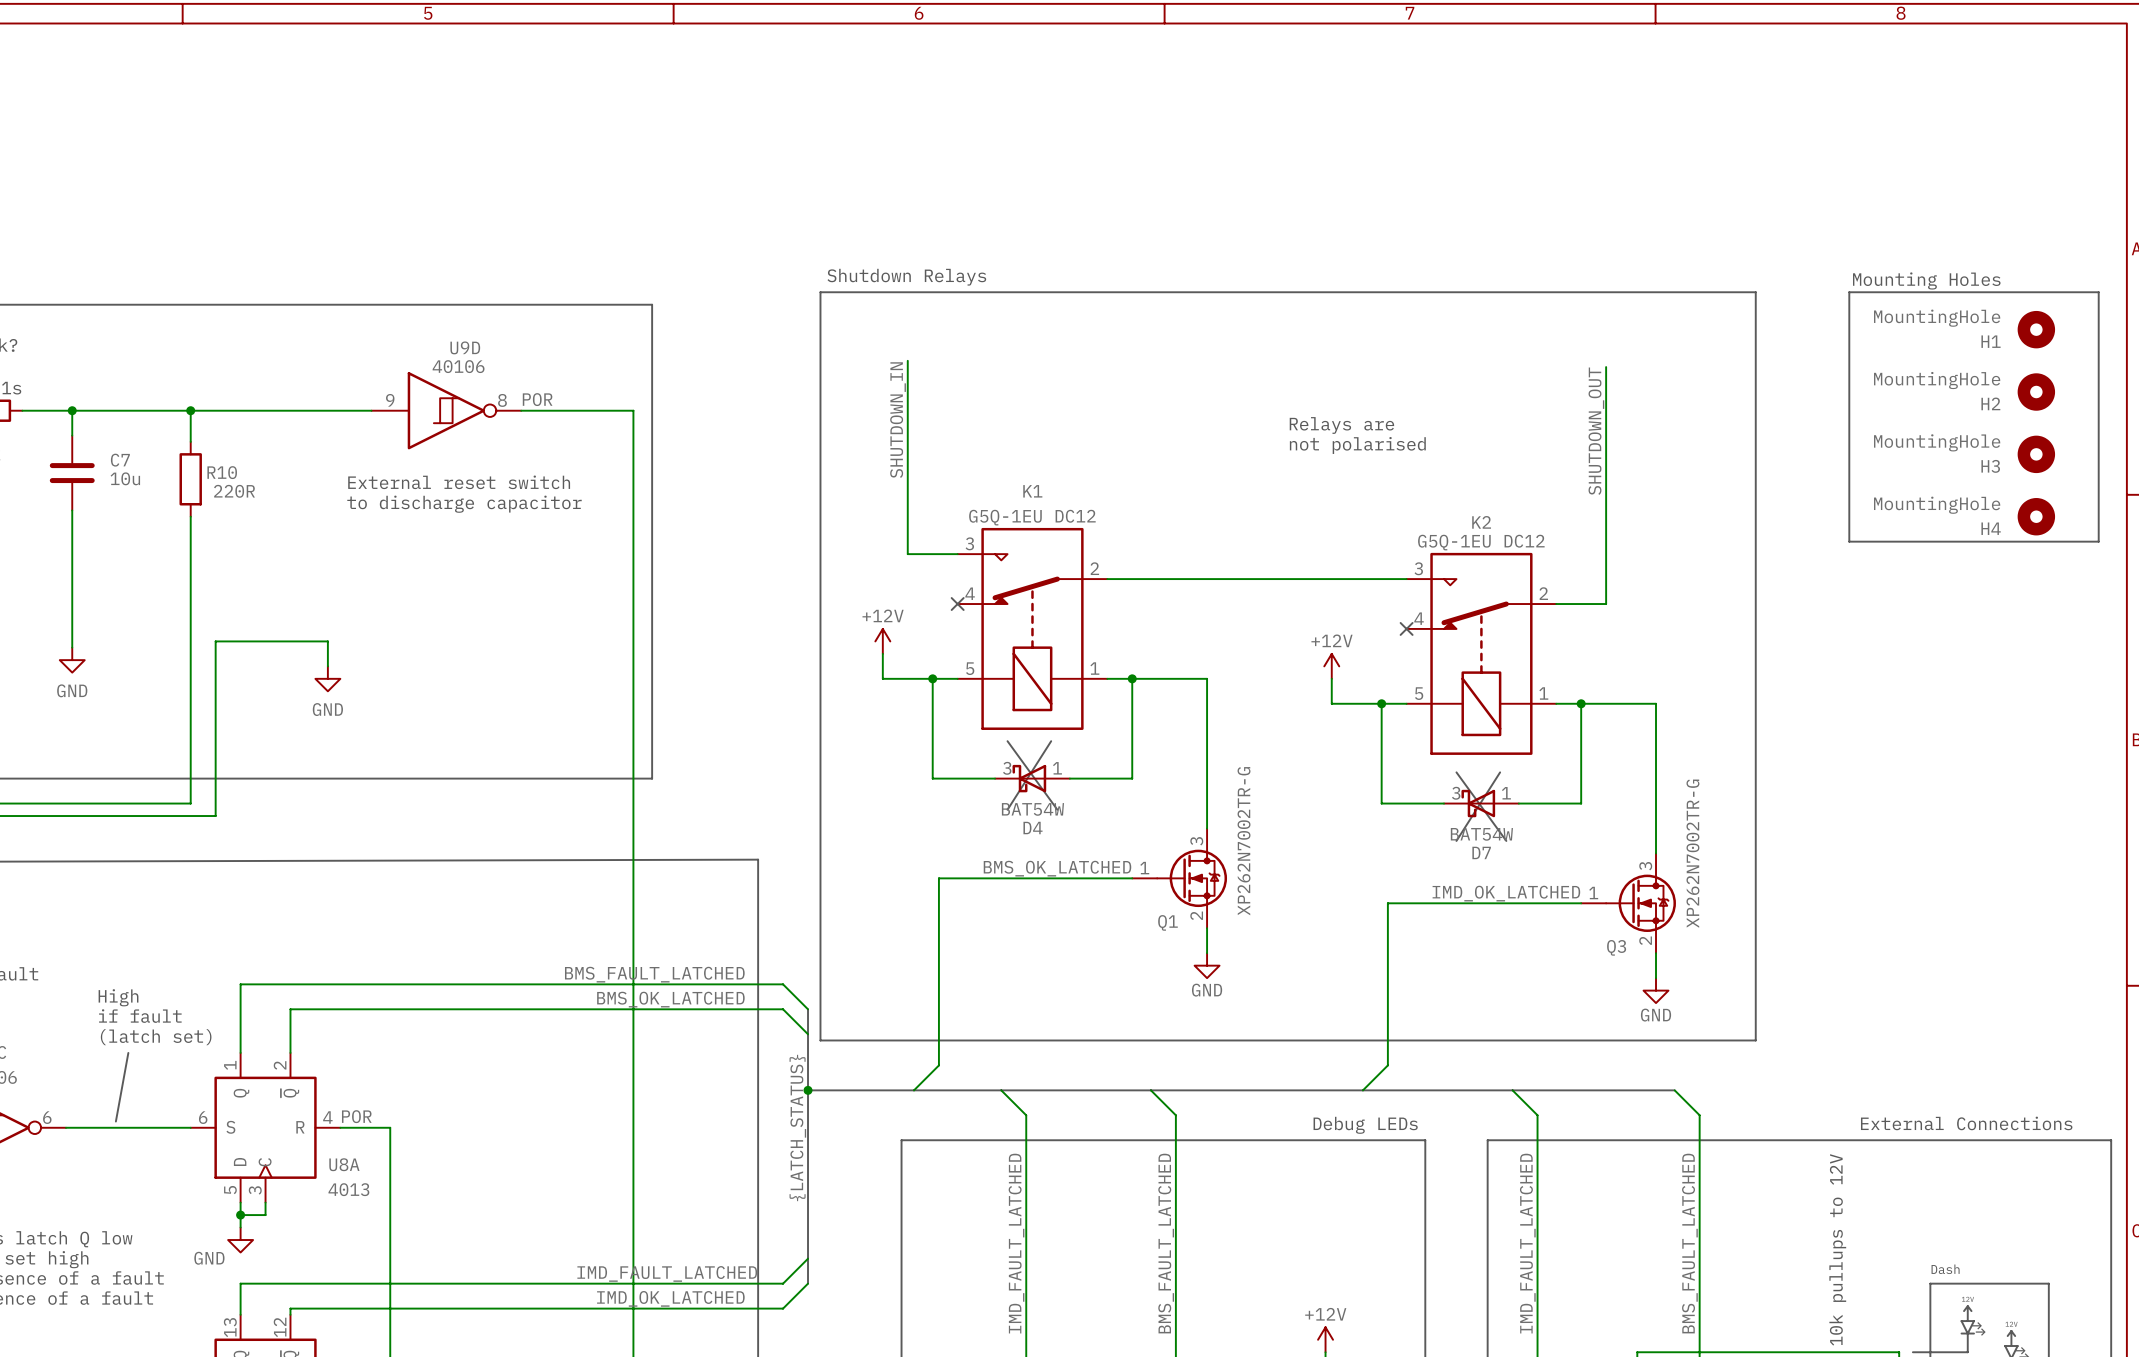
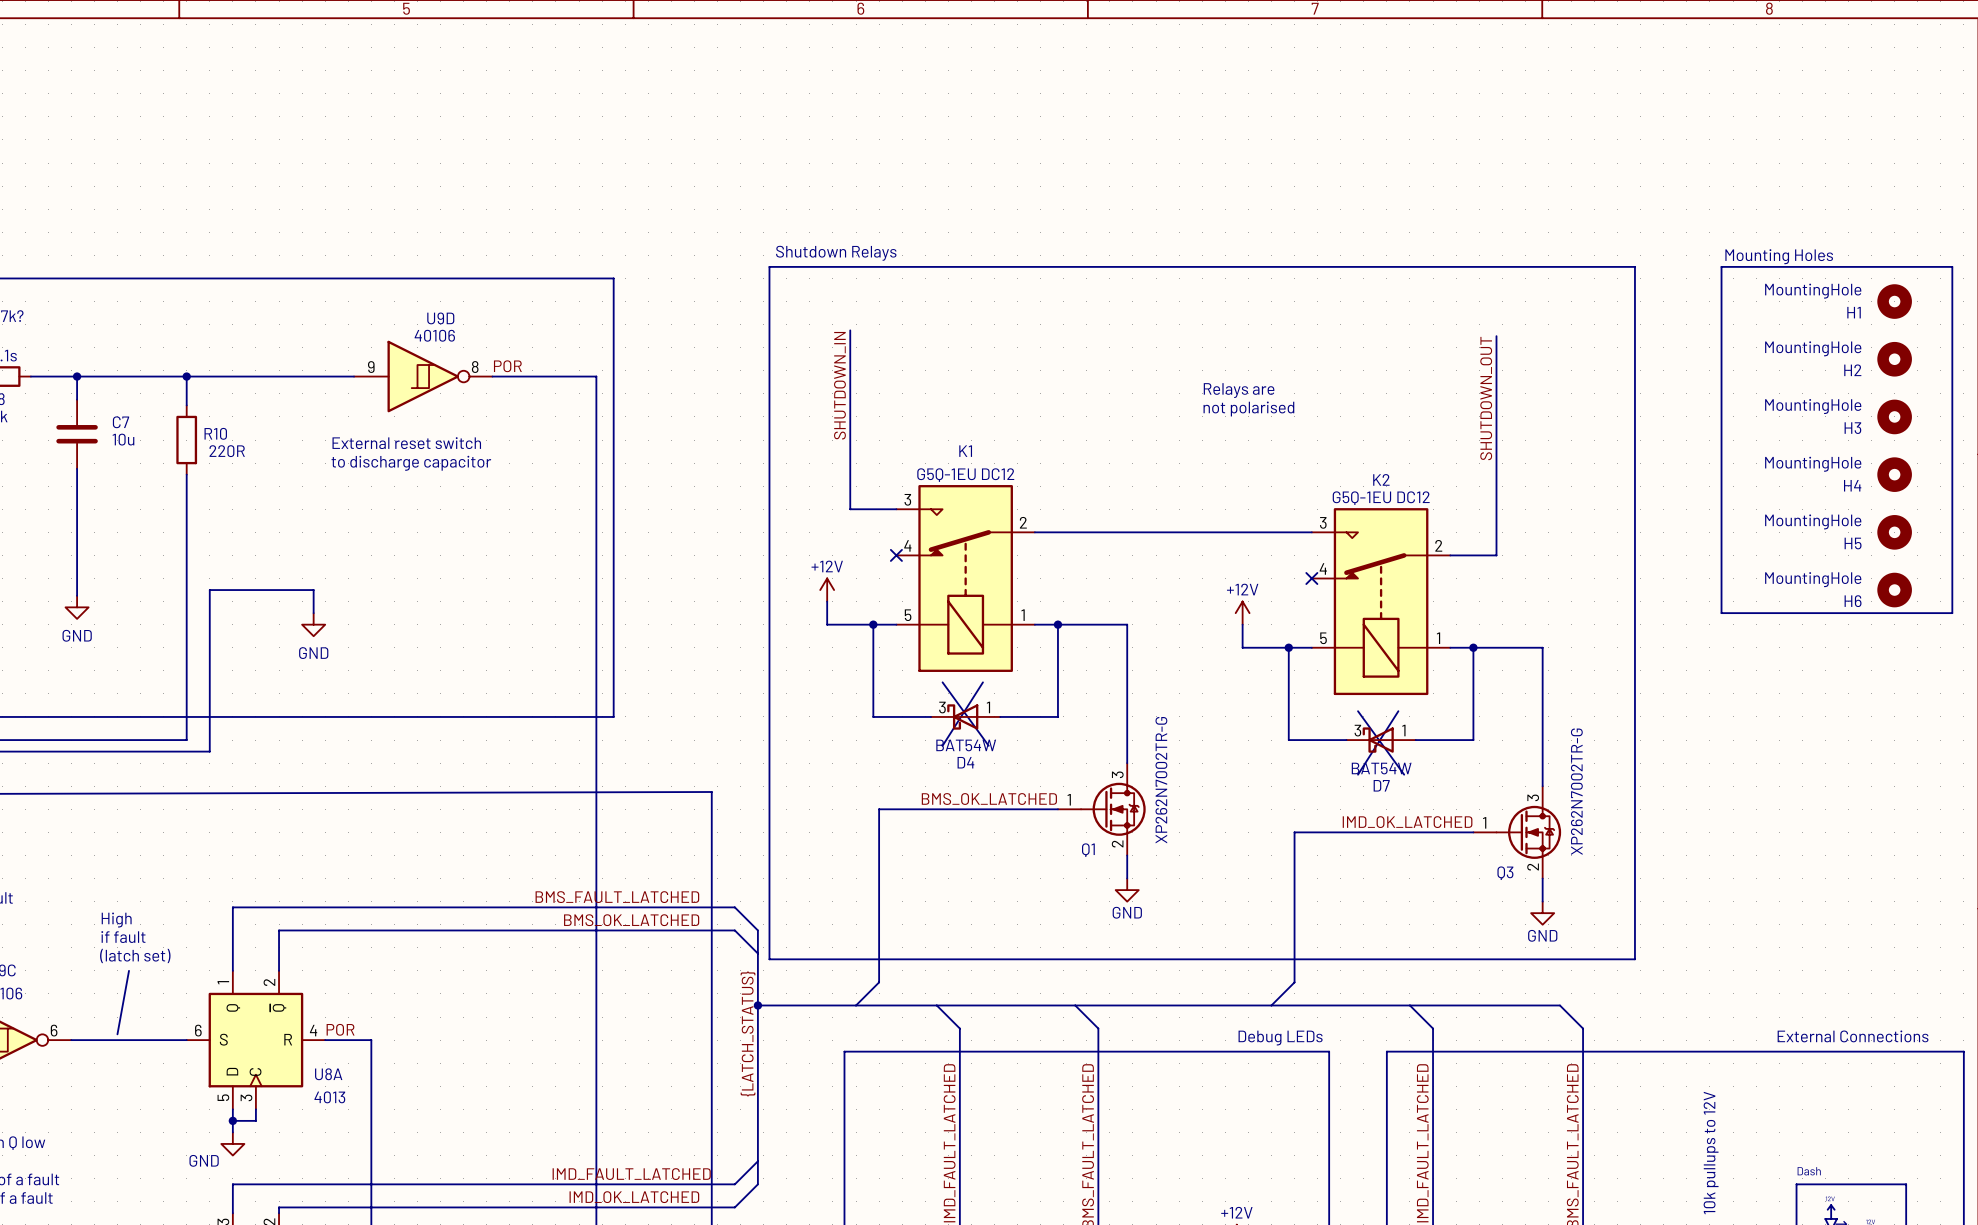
line: (1849, 541) (2098, 541) -> (1721, 497) (1721, 613) (1952, 613) (1952, 497)
H5: none -> MountingHole (1894, 532)
H6: none -> MountingHole (1894, 590)

